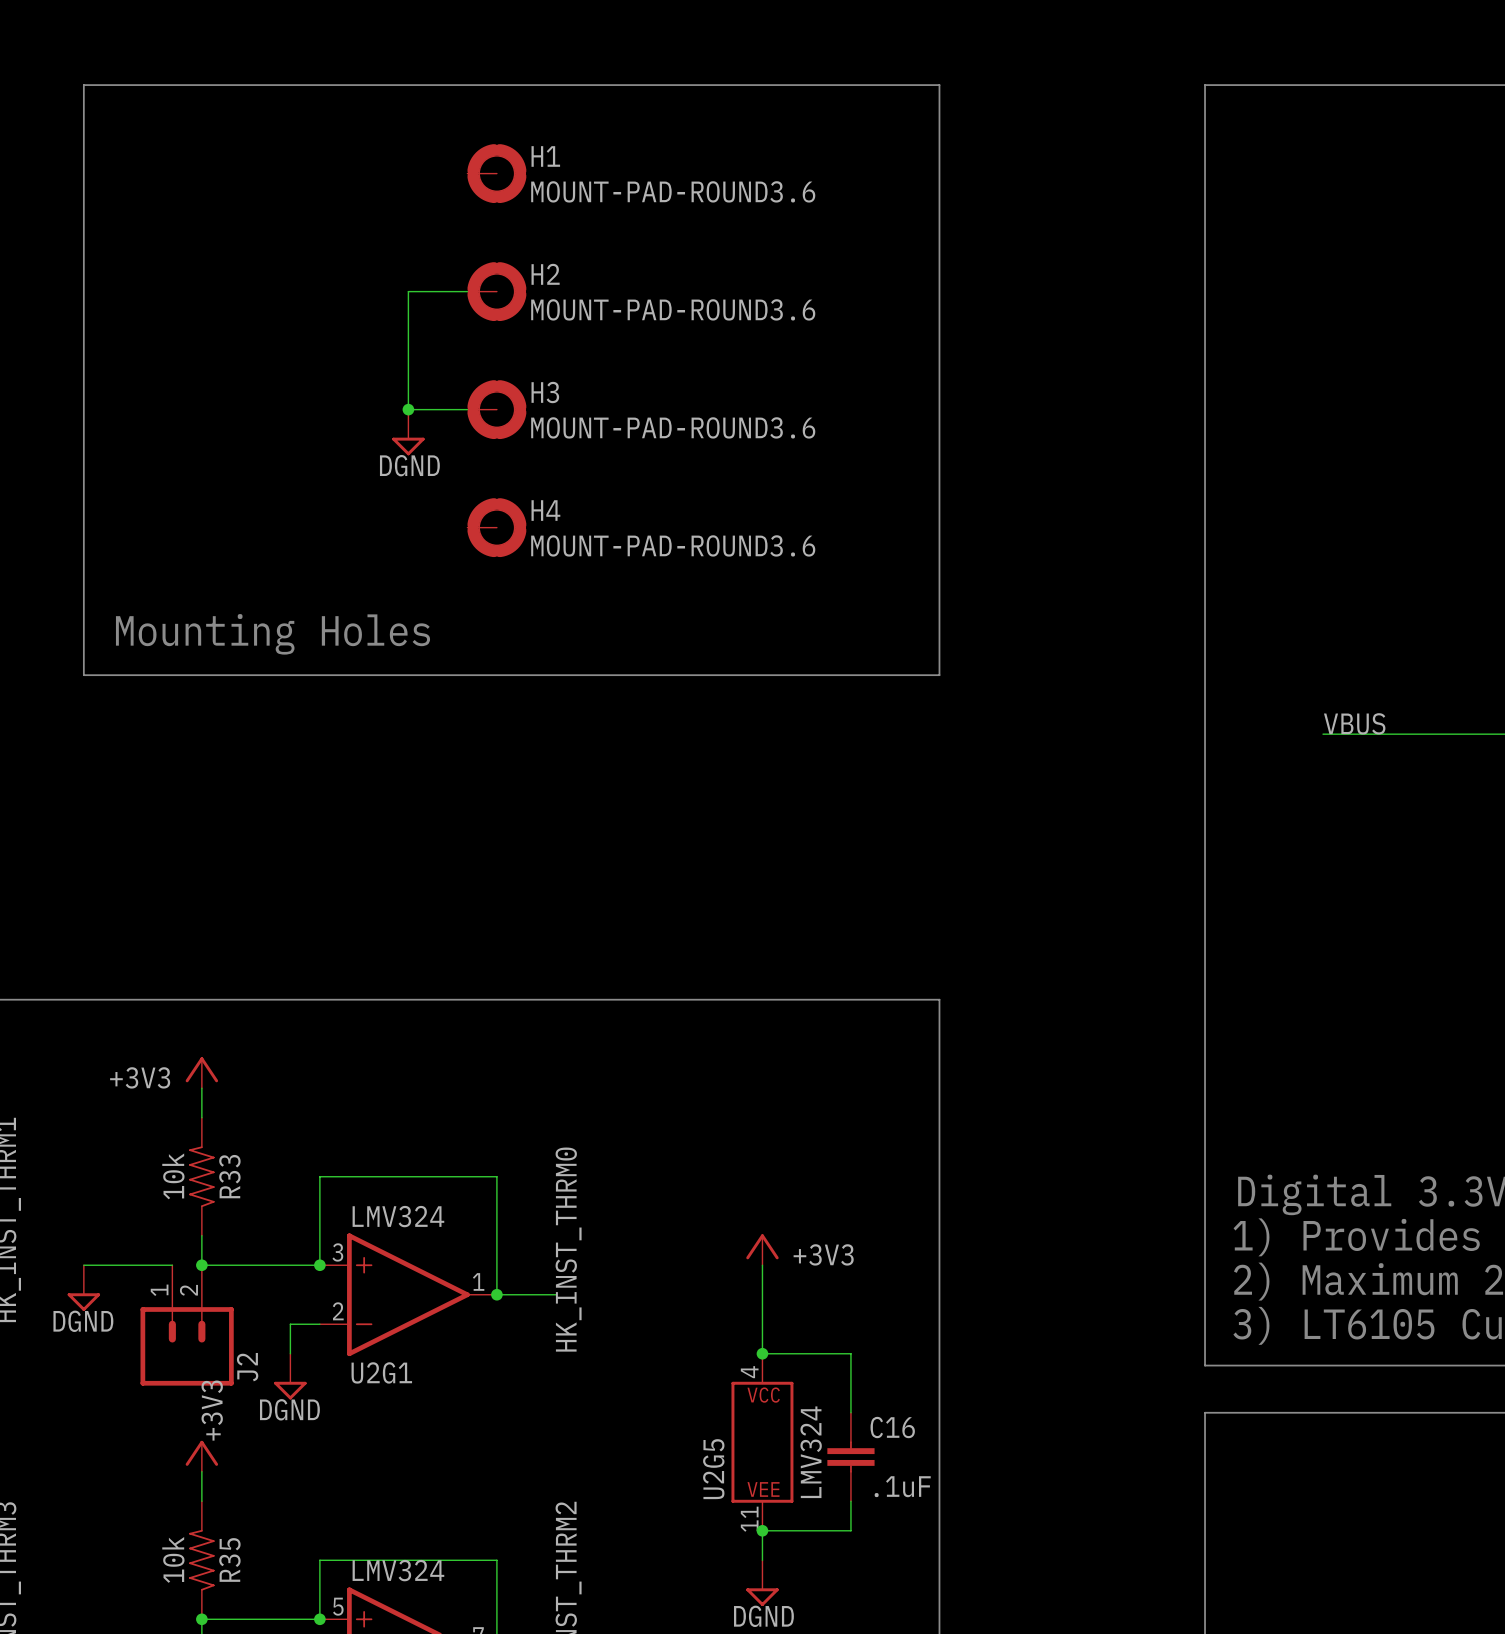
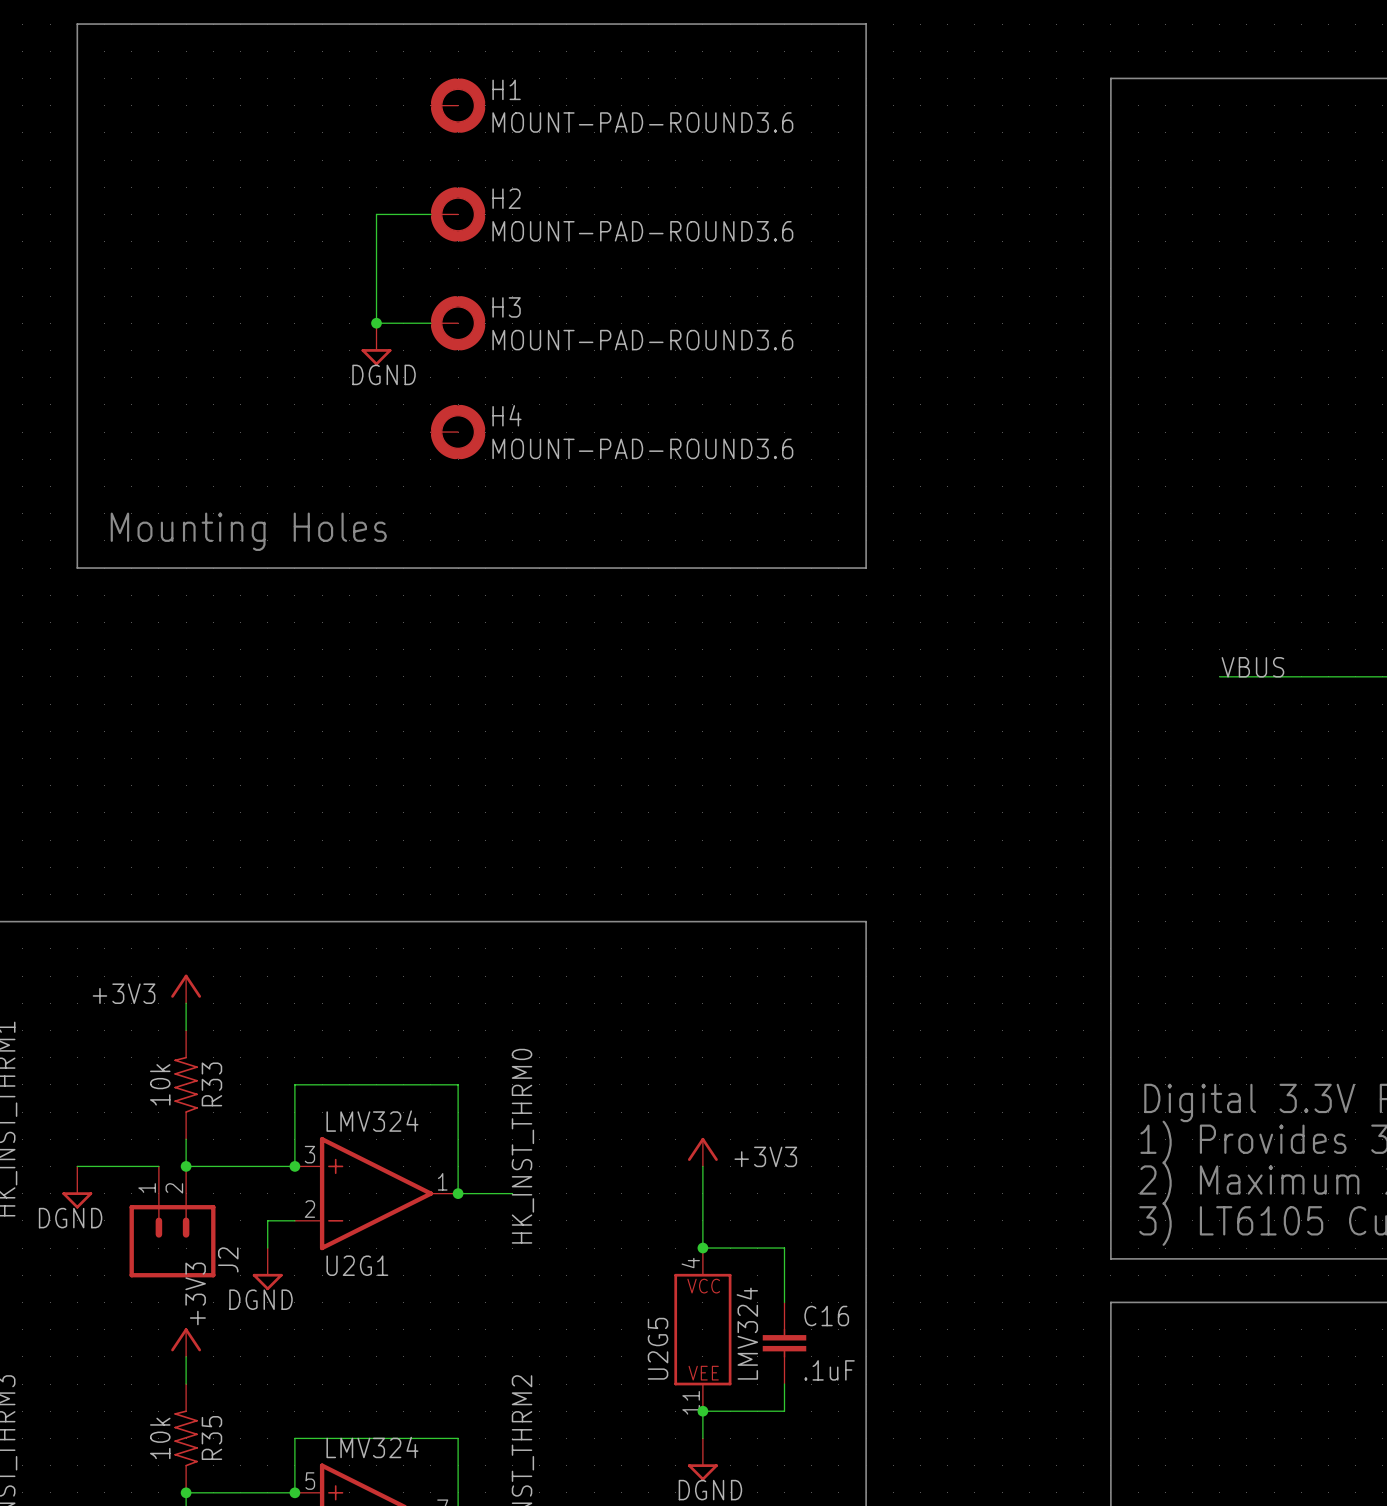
line: (83, 85) (939, 85) -> (77, 78) (77, 24) (866, 24) (866, 78)
H1 position: (496, 173) -> (458, 105)
wire: (408, 291) (467, 291) -> (376, 268) (376, 214) (430, 214)
H2 position: (496, 291) -> (458, 214)
wire: (408, 350) (408, 409) (467, 409) -> (376, 323) (430, 323)
junction position: (408, 409) -> (376, 323)
H3 position: (496, 409) -> (458, 323)
power symbol position: DGND (408, 432) -> DGND (376, 344)
H4 position: (496, 527) -> (458, 432)
line: (83, 616) (83, 675) (939, 675) (939, 616) -> (77, 568) (866, 568)
text position: Mounting Holes (272, 634) -> Mounting Holes (248, 531)

